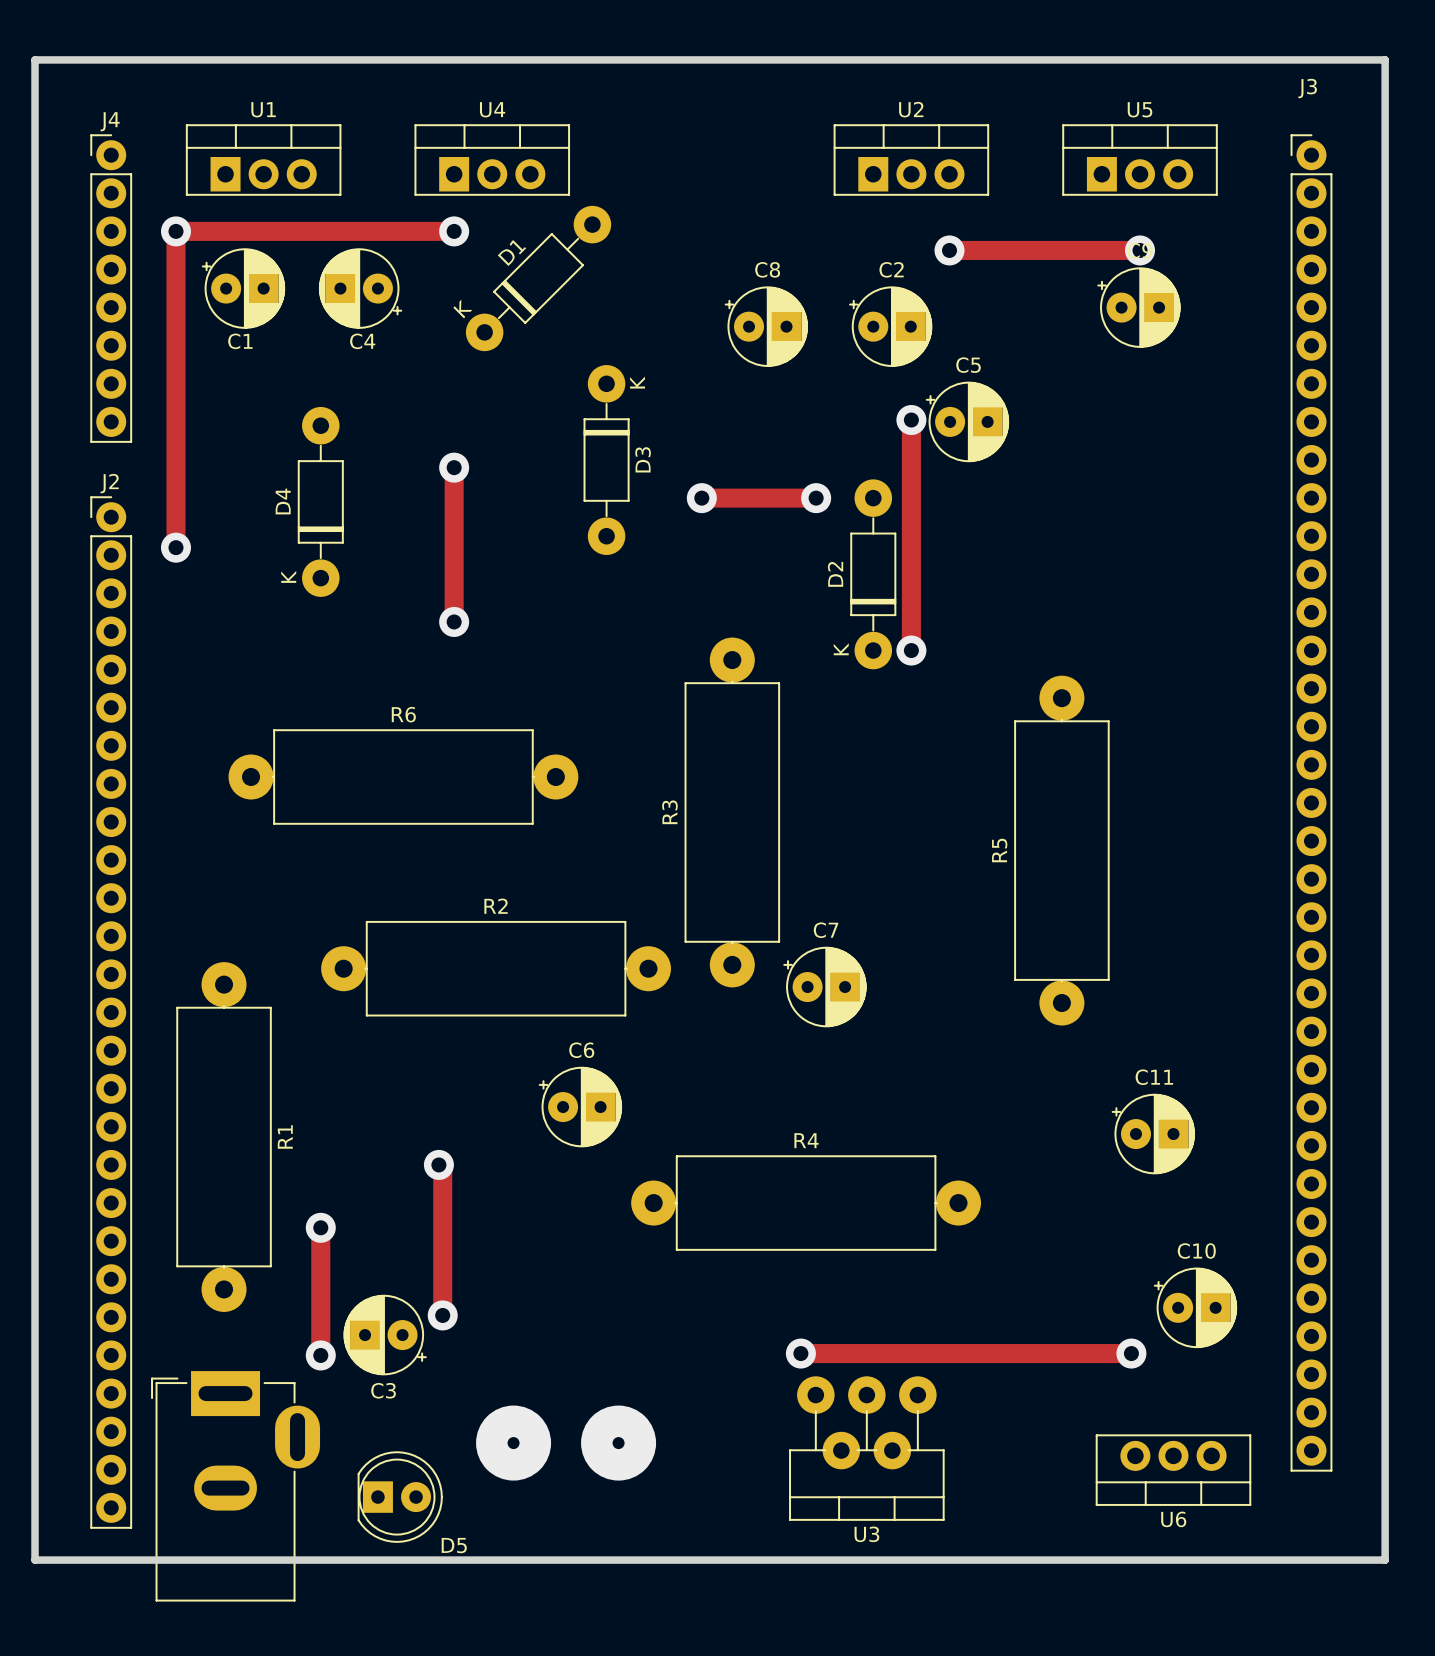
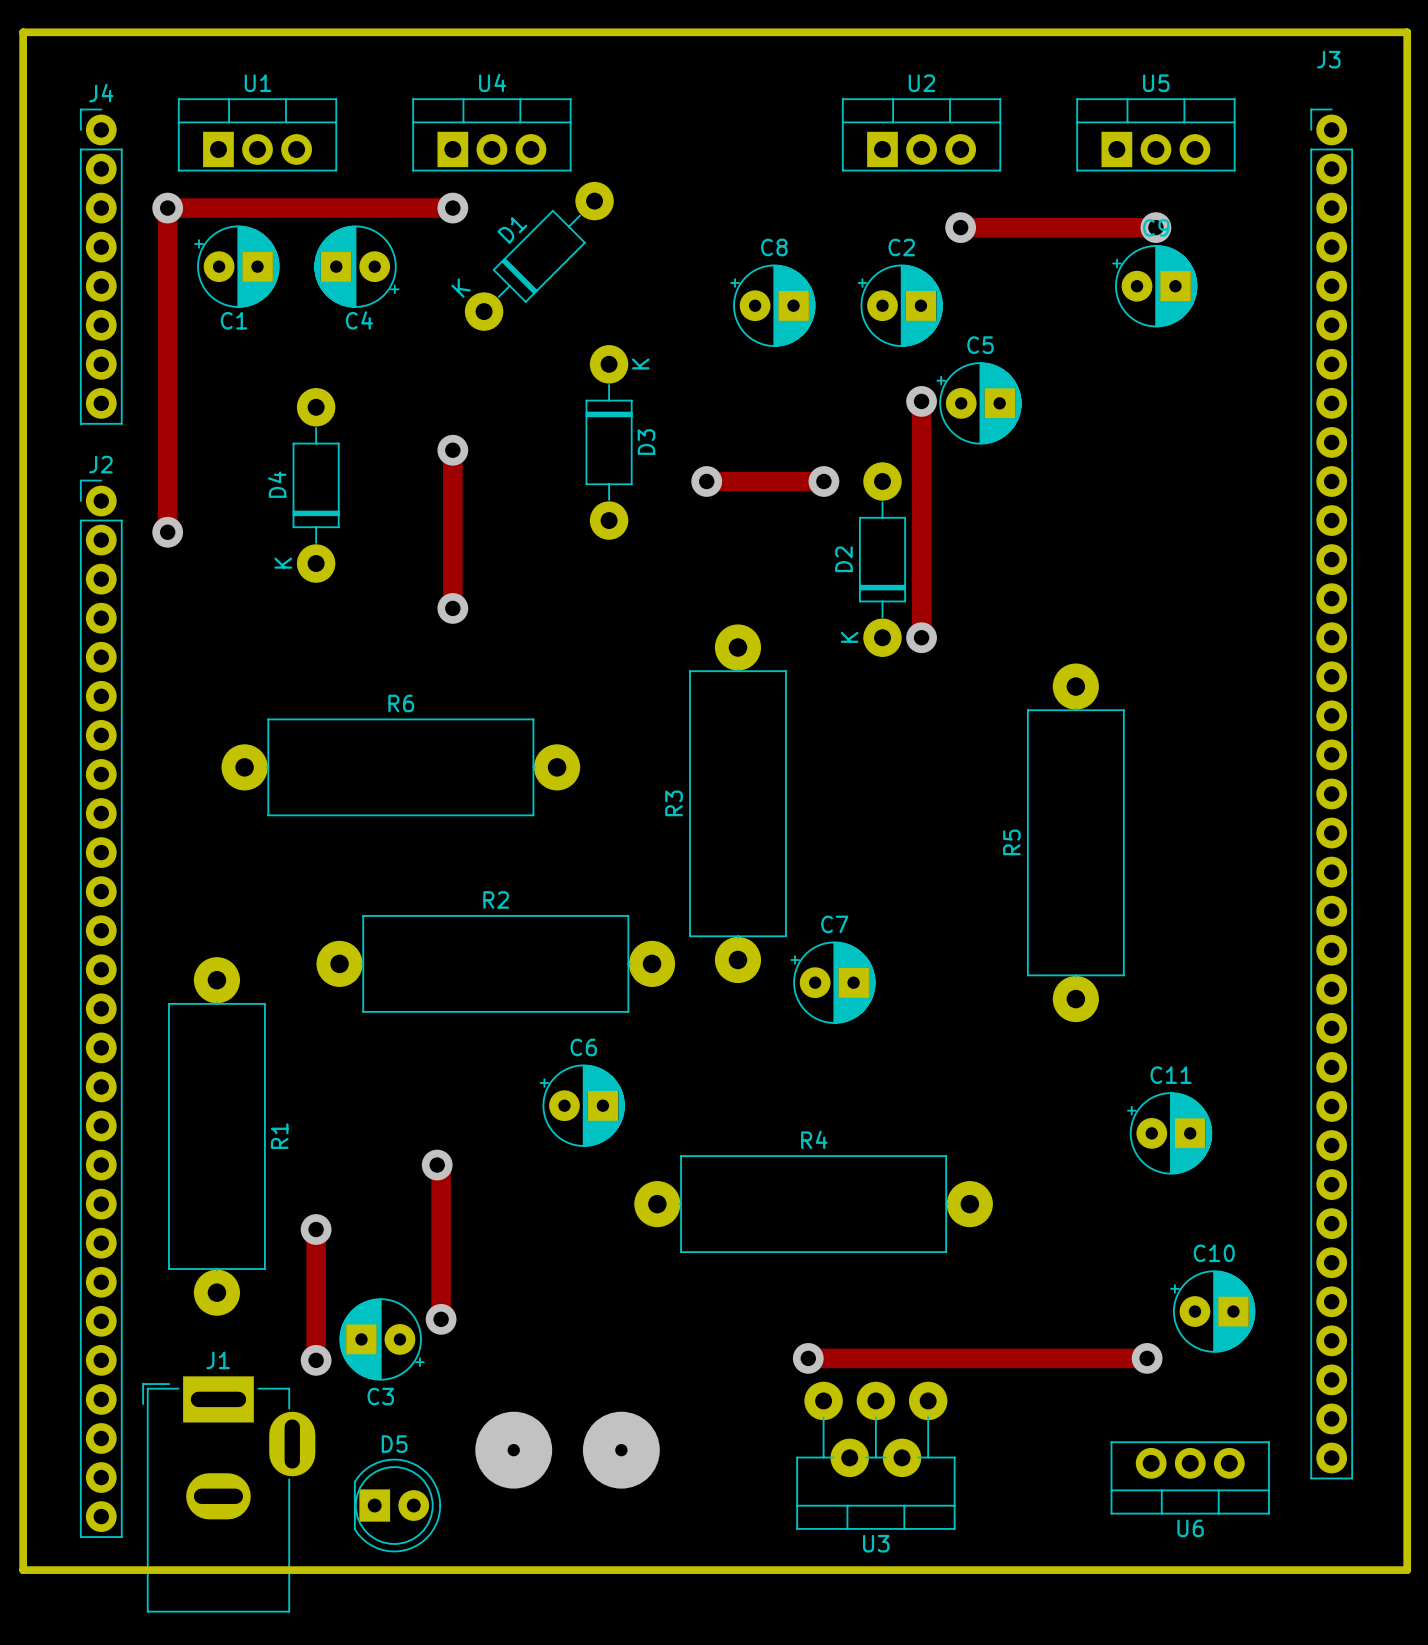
J1 name: none -> J1 (218, 1360)
D5 name position: D5 (454, 1545) -> D5 (394, 1444)

